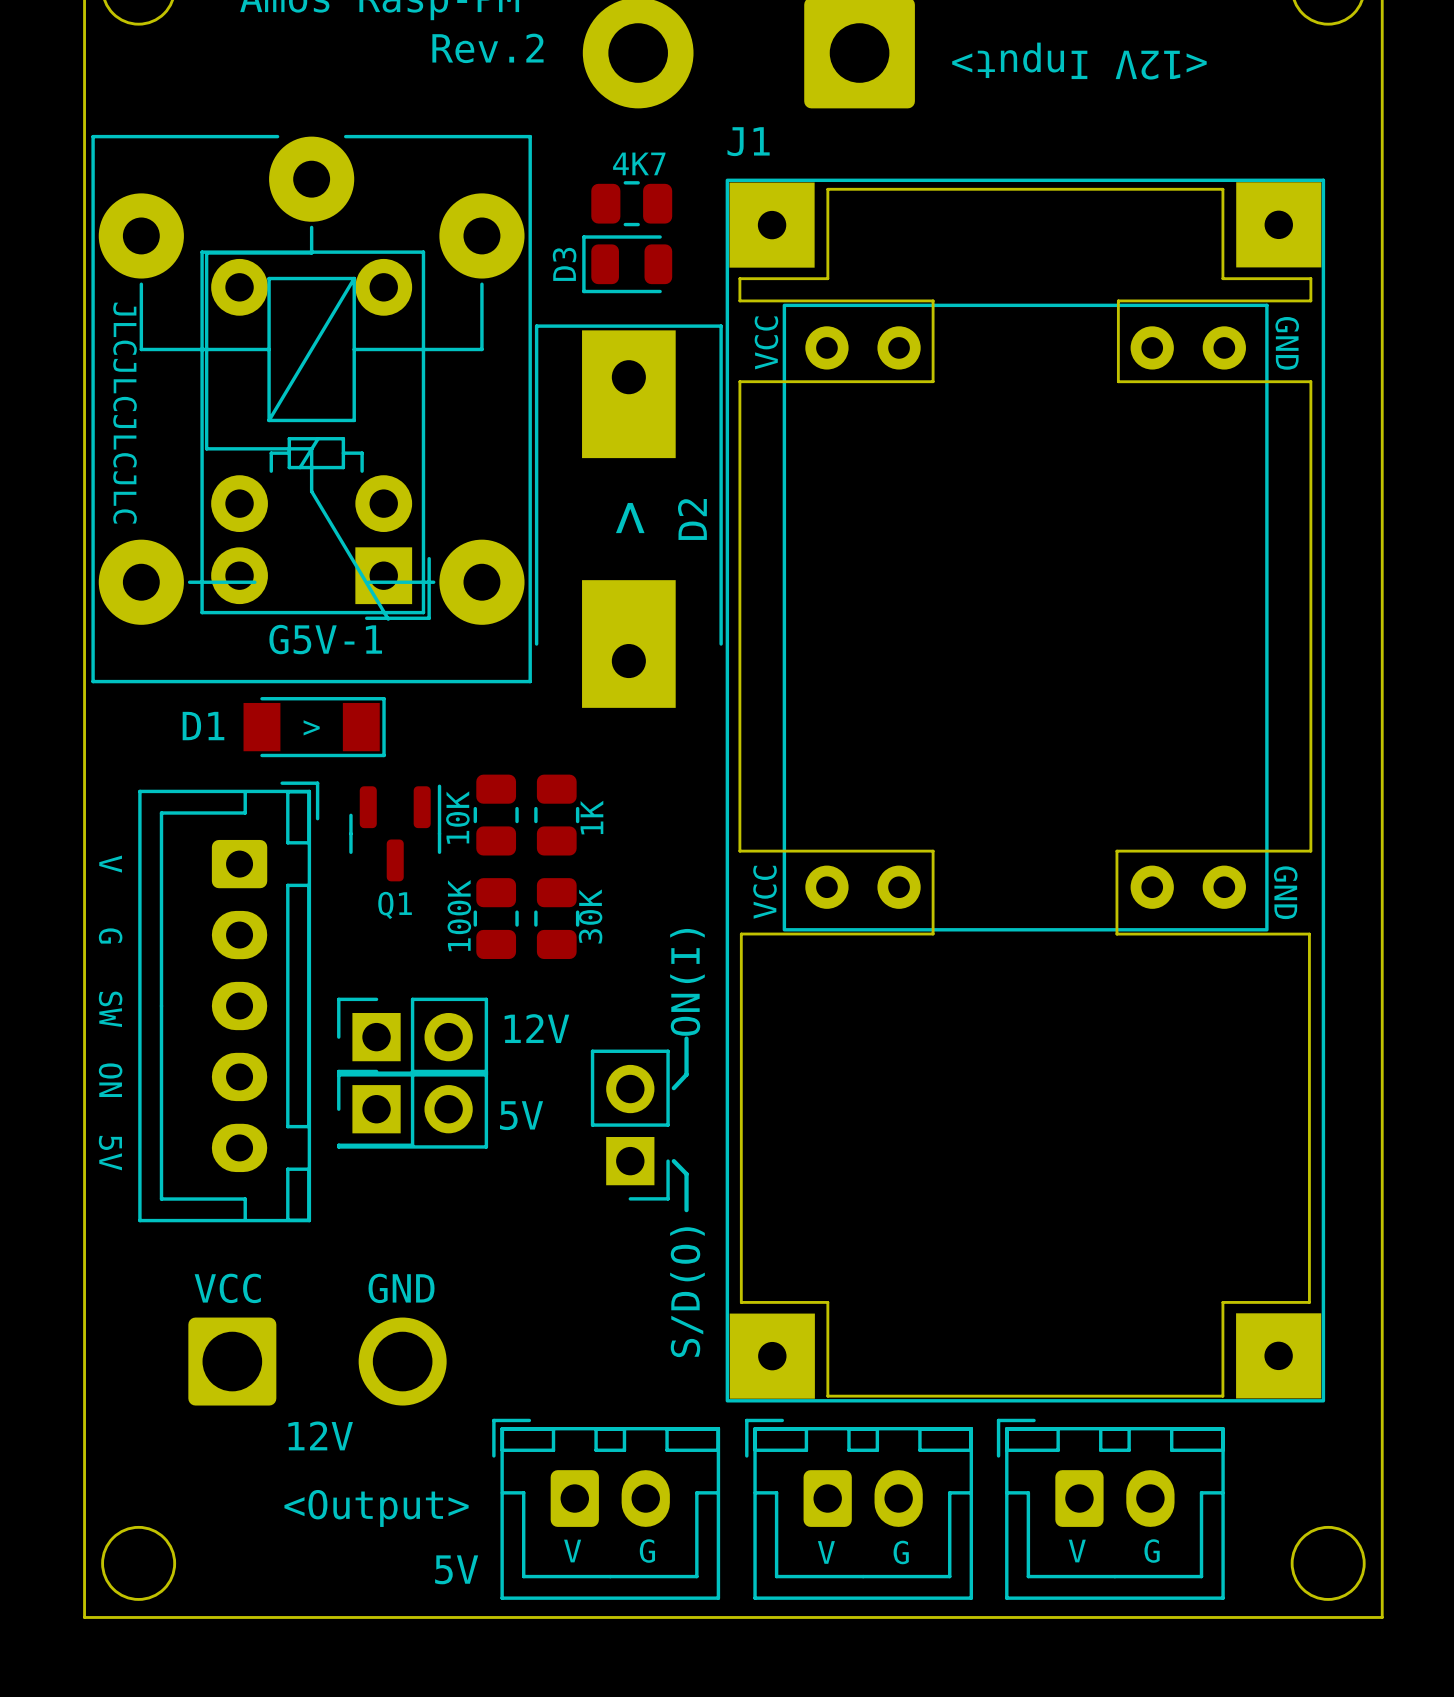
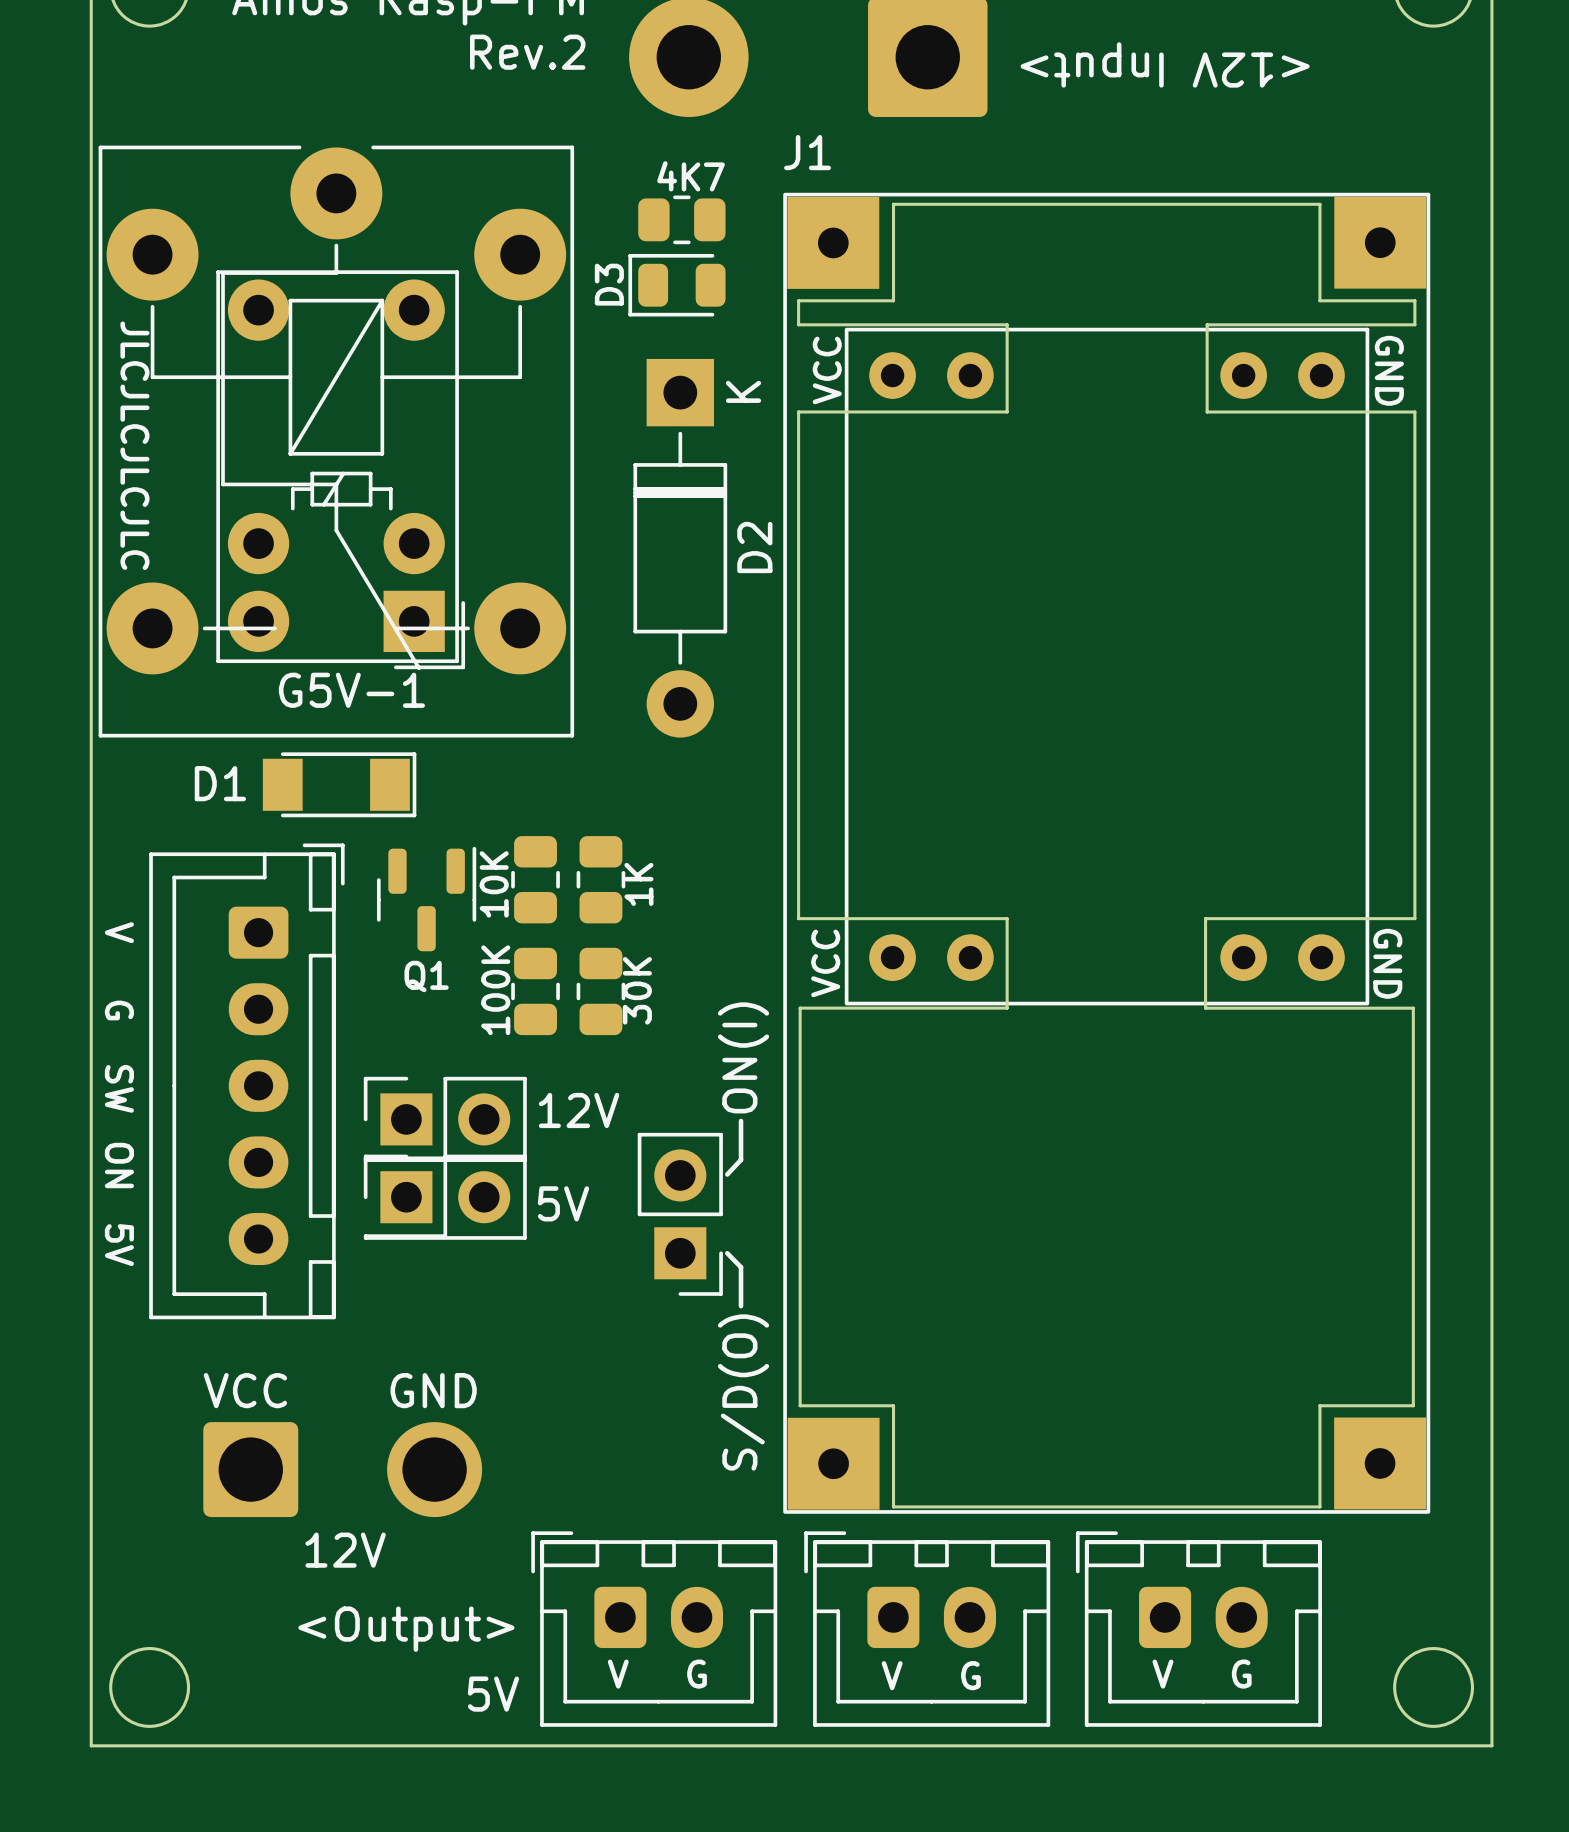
D2 footprint: [534, 324, 723, 708] -> [633, 358, 728, 738]
text: > (630, 518) -> none
text: > (311, 727) -> none

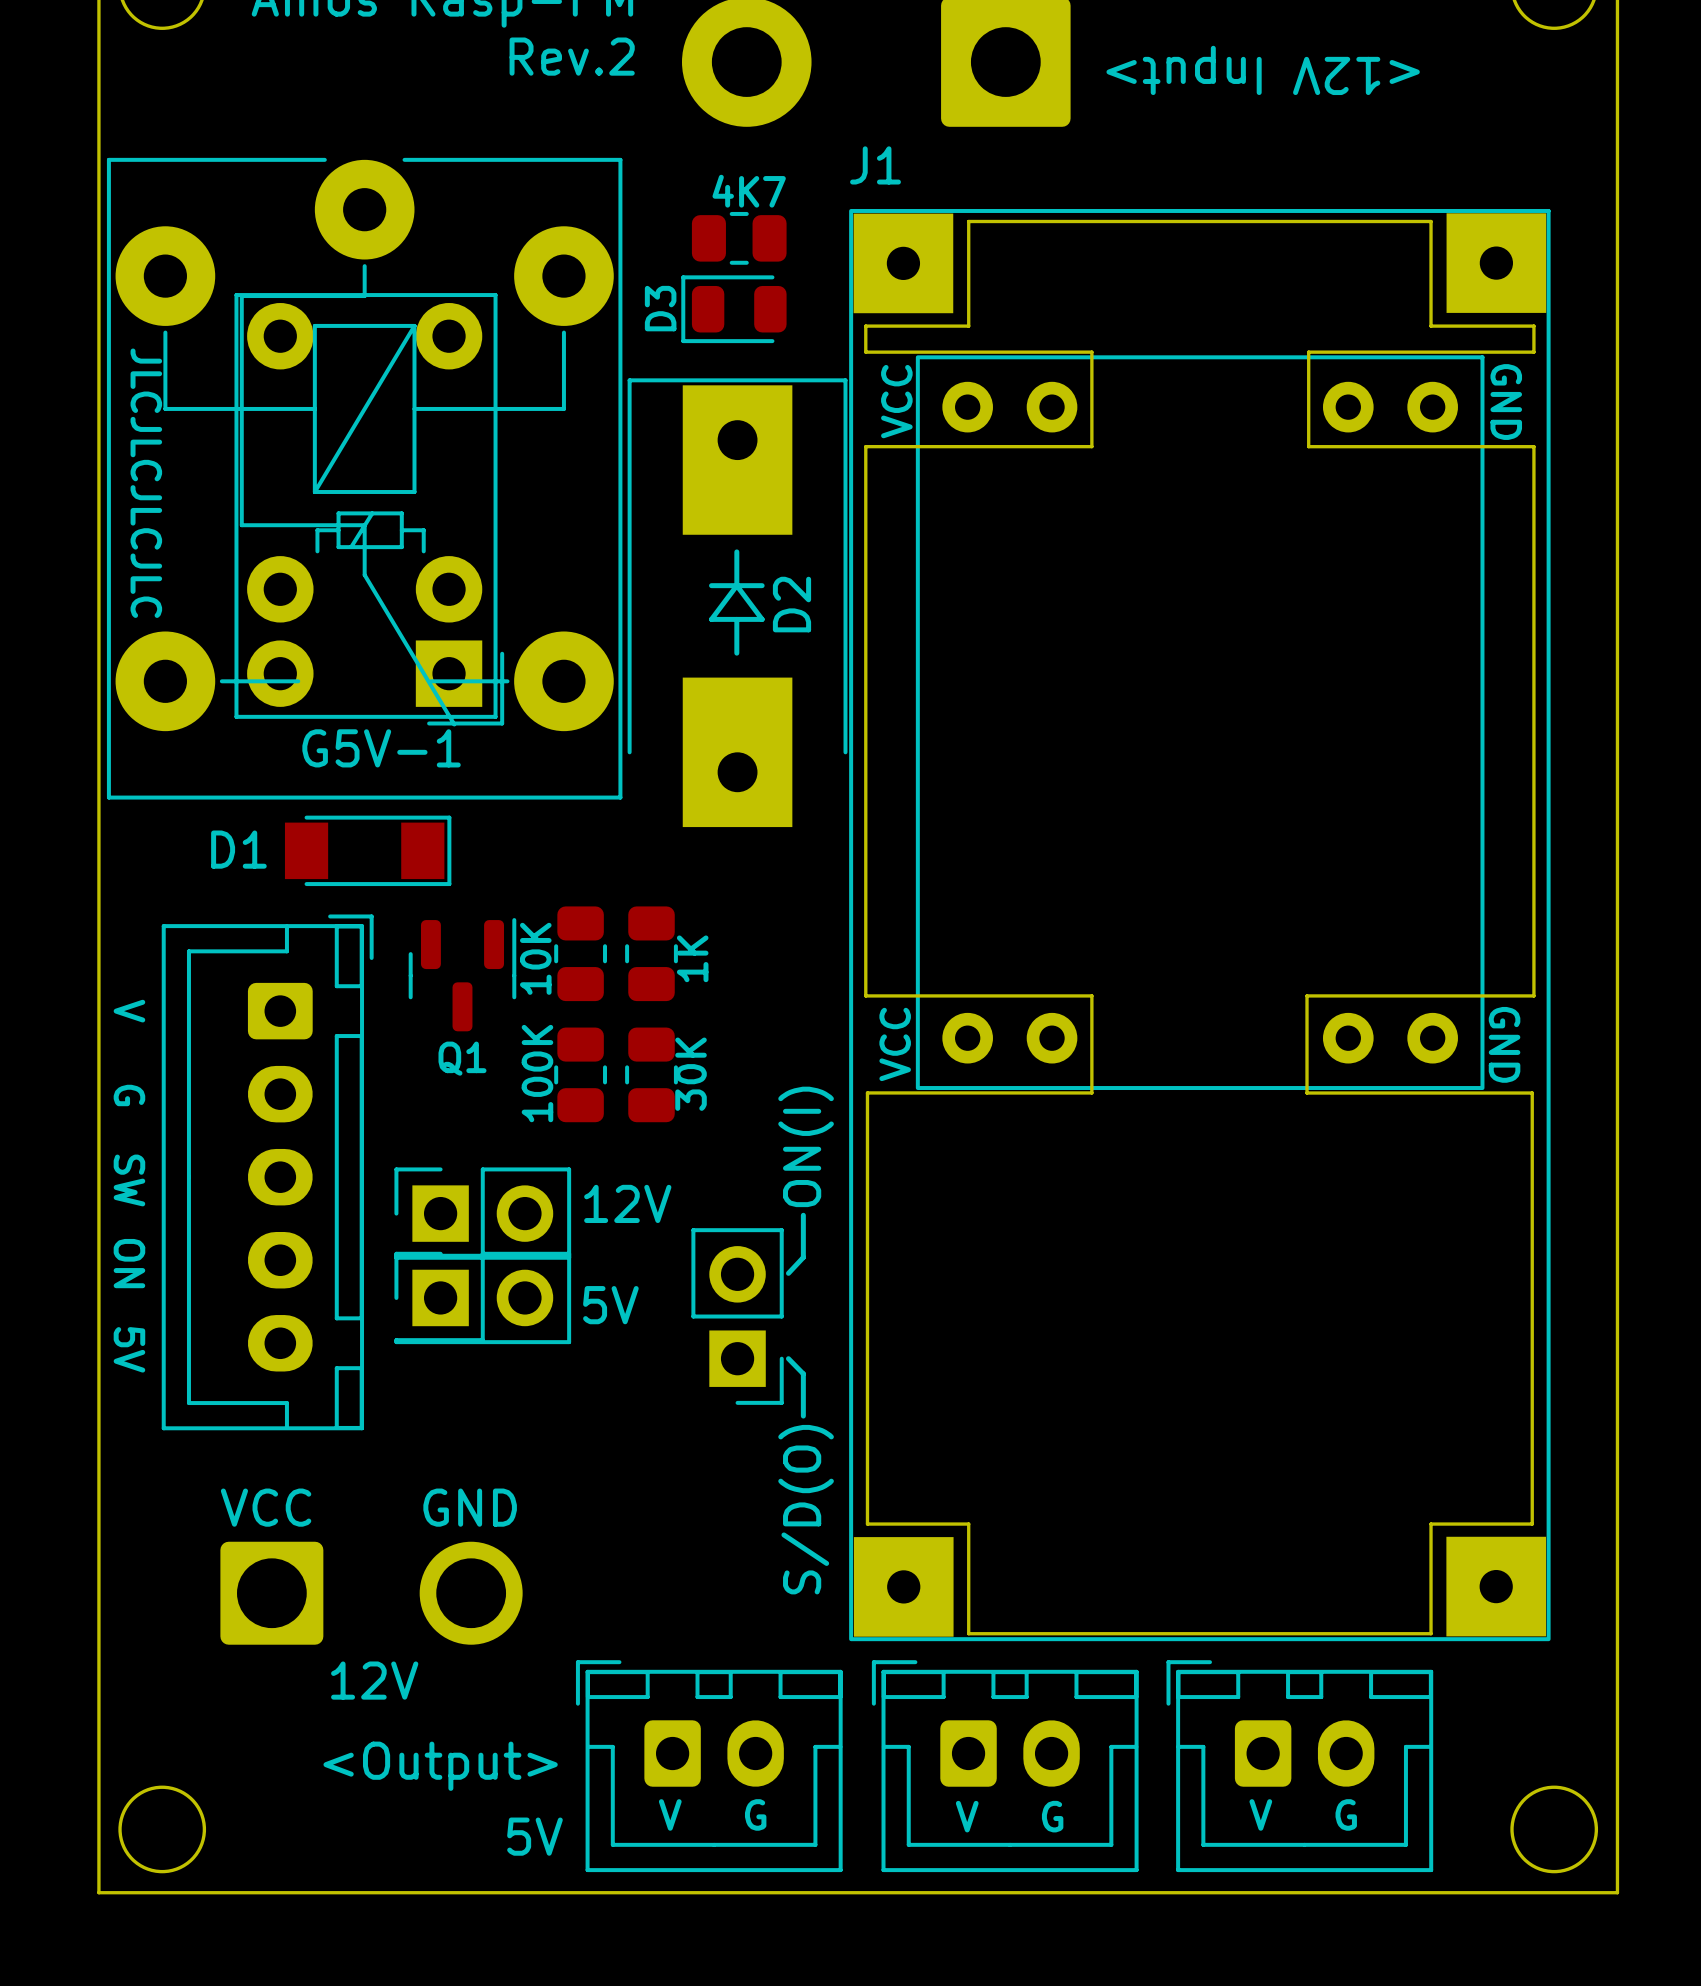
D2 footprint: [633, 358, 728, 738] -> [627, 378, 848, 828]
line: none -> (736, 551) (736, 585)
line: none -> (711, 585) (762, 585)
line: none -> (736, 585) (711, 619) (762, 619) (736, 585)
line: none -> (736, 619) (736, 653)

